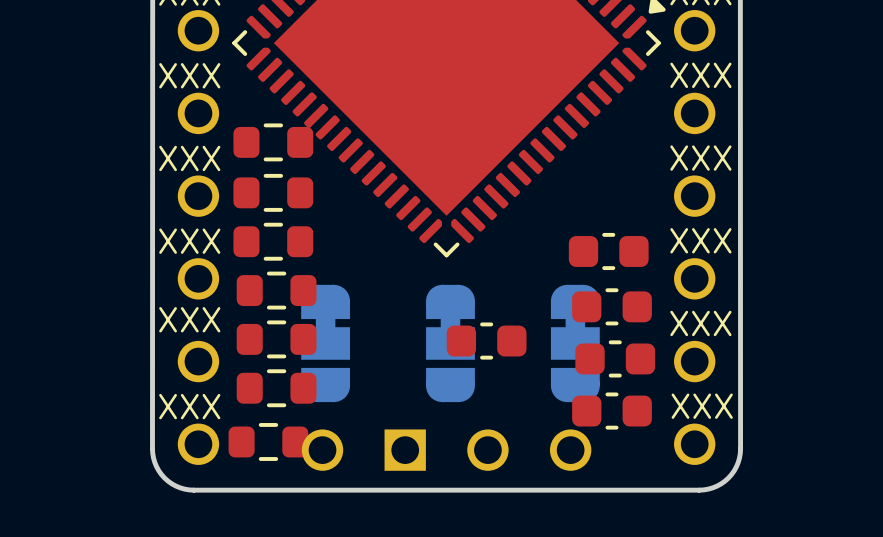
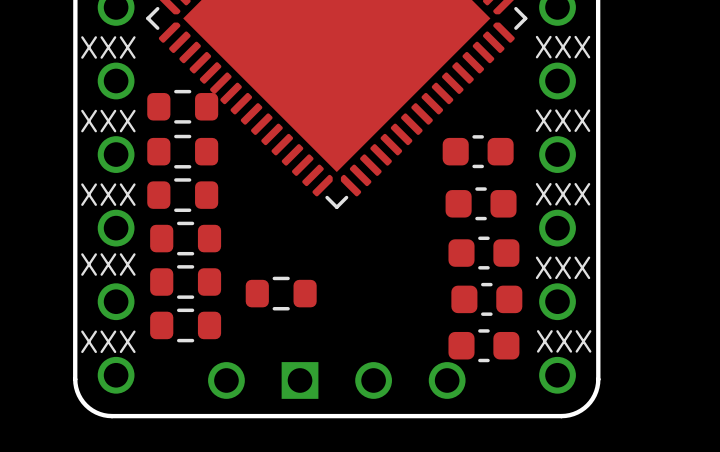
part position: (486, 341) -> (478, 151)
part: (325, 343) -> none
part: (450, 343) -> none
part: (575, 343) -> none
part position: (268, 441) -> (281, 293)

